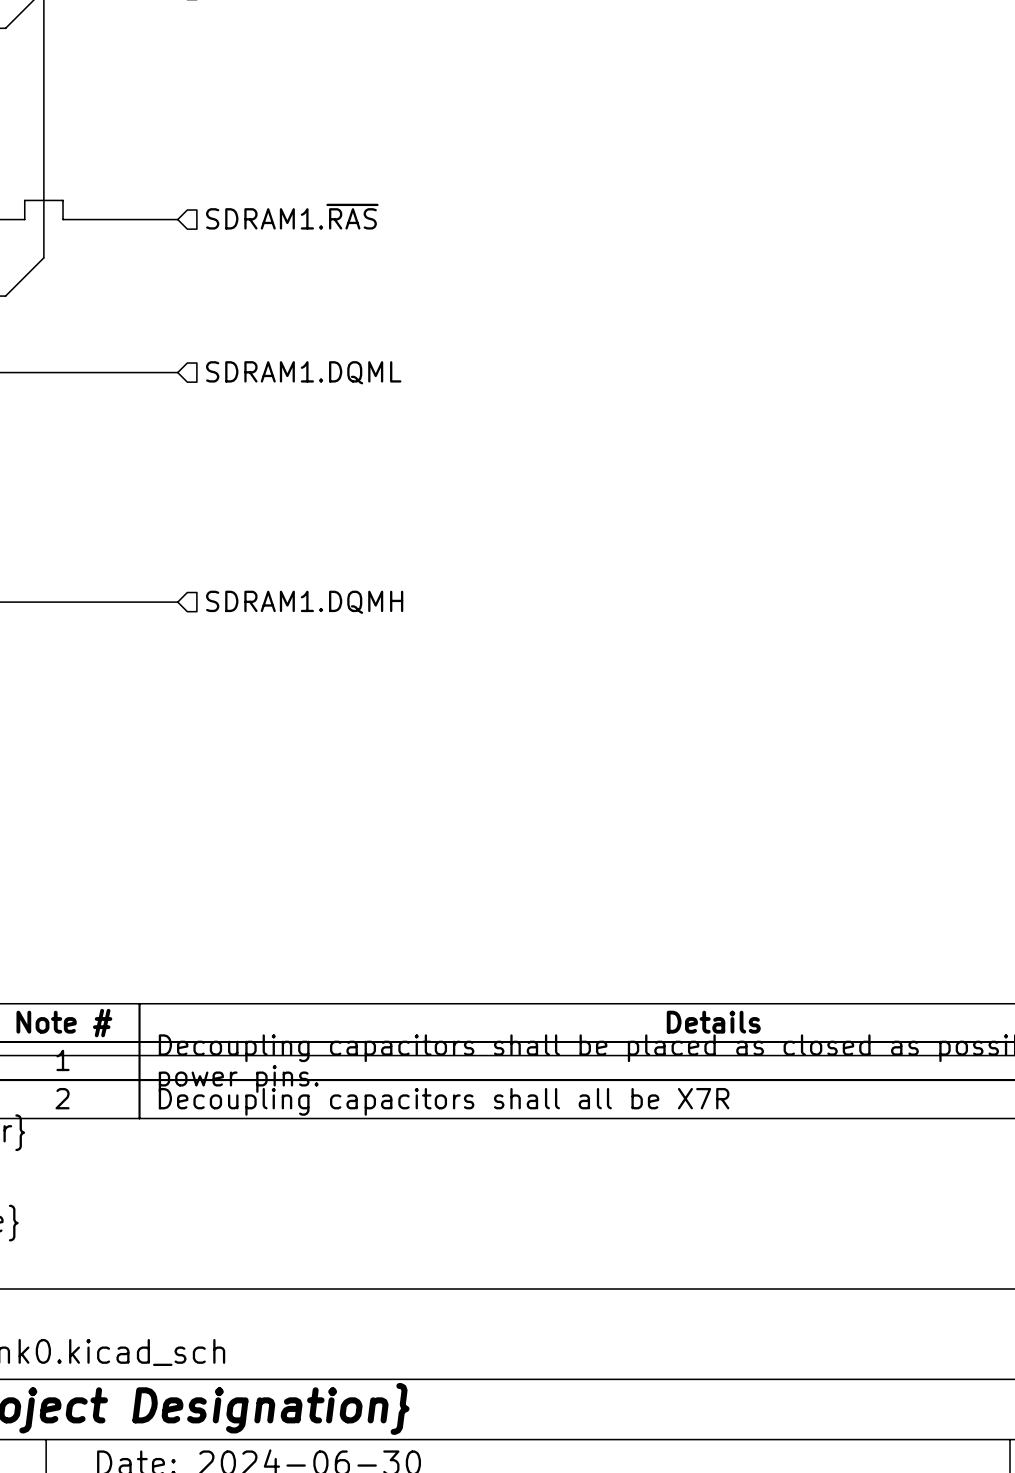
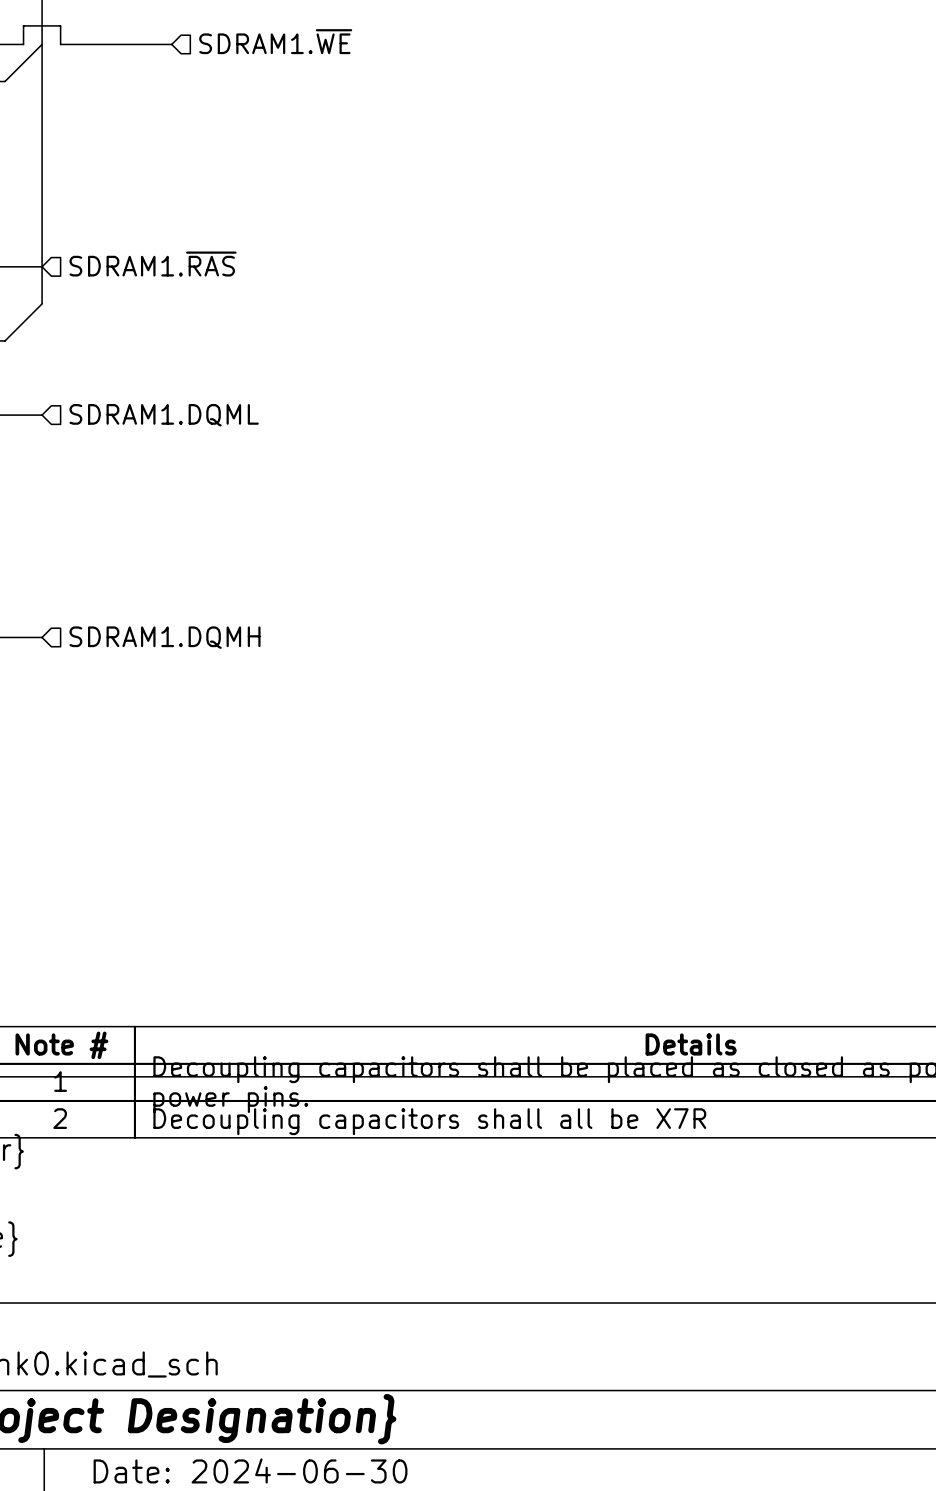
hierarchical label position: SDRAM1.~{RAS} (292, 216) -> SDRAM1.~{RAS} (153, 264)
wire: (24, 219) (24, 200) (63, 200) (63, 219) (177, 219) -> (23, 266) (42, 266)
wire: (43, 372) (177, 372) -> none
hierarchical label position: SDRAM1.DQML (303, 372) -> SDRAM1.DQML (164, 415)
wire: (43, 602) (177, 602) -> none
hierarchical label position: SDRAM1.DQMH (304, 602) -> SDRAM1.DQMH (165, 637)

